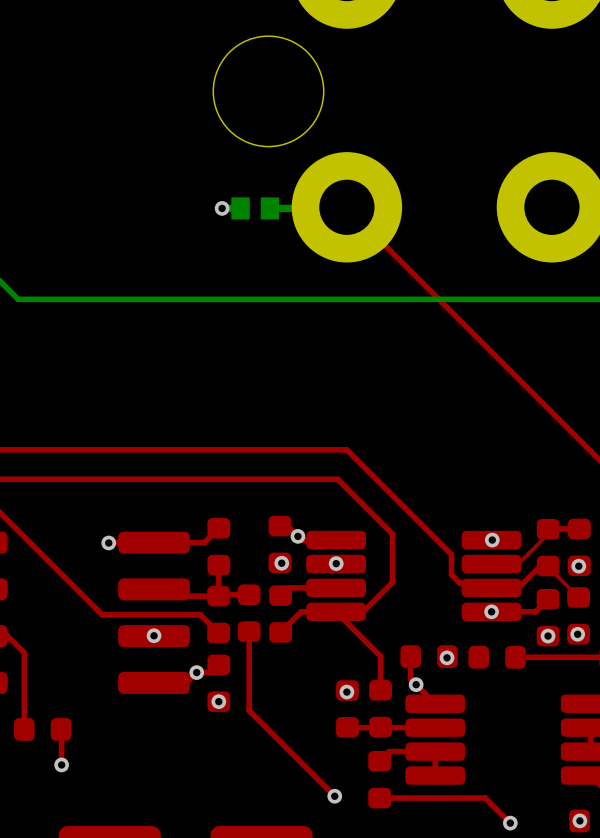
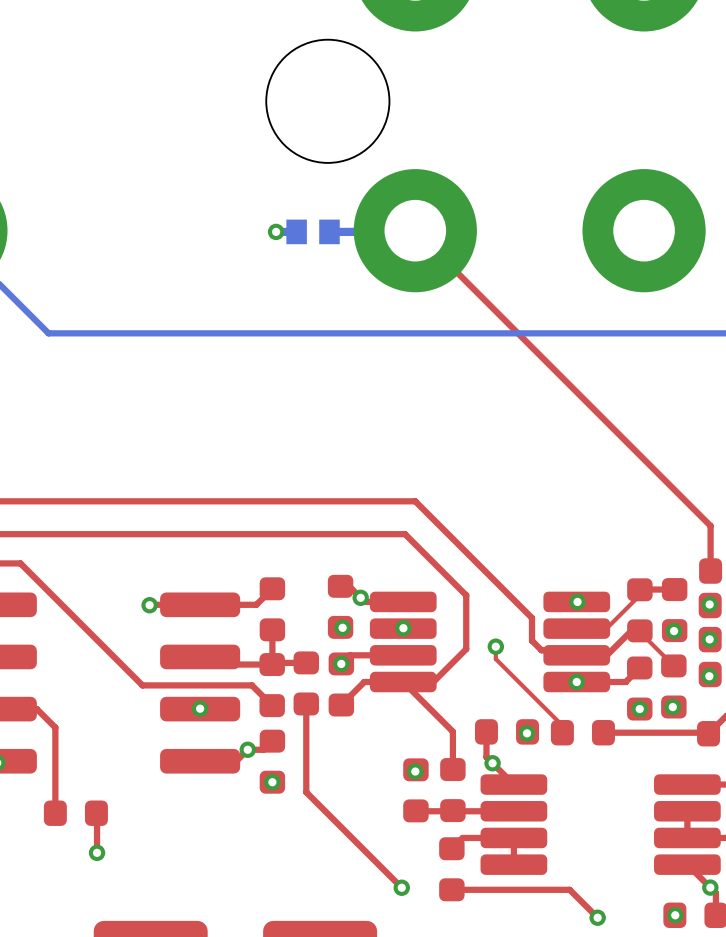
top track: none -> (495, 646) (495, 659) (562, 725) (562, 732)
via: none -> (495, 646)
via: none -> (341, 663)

